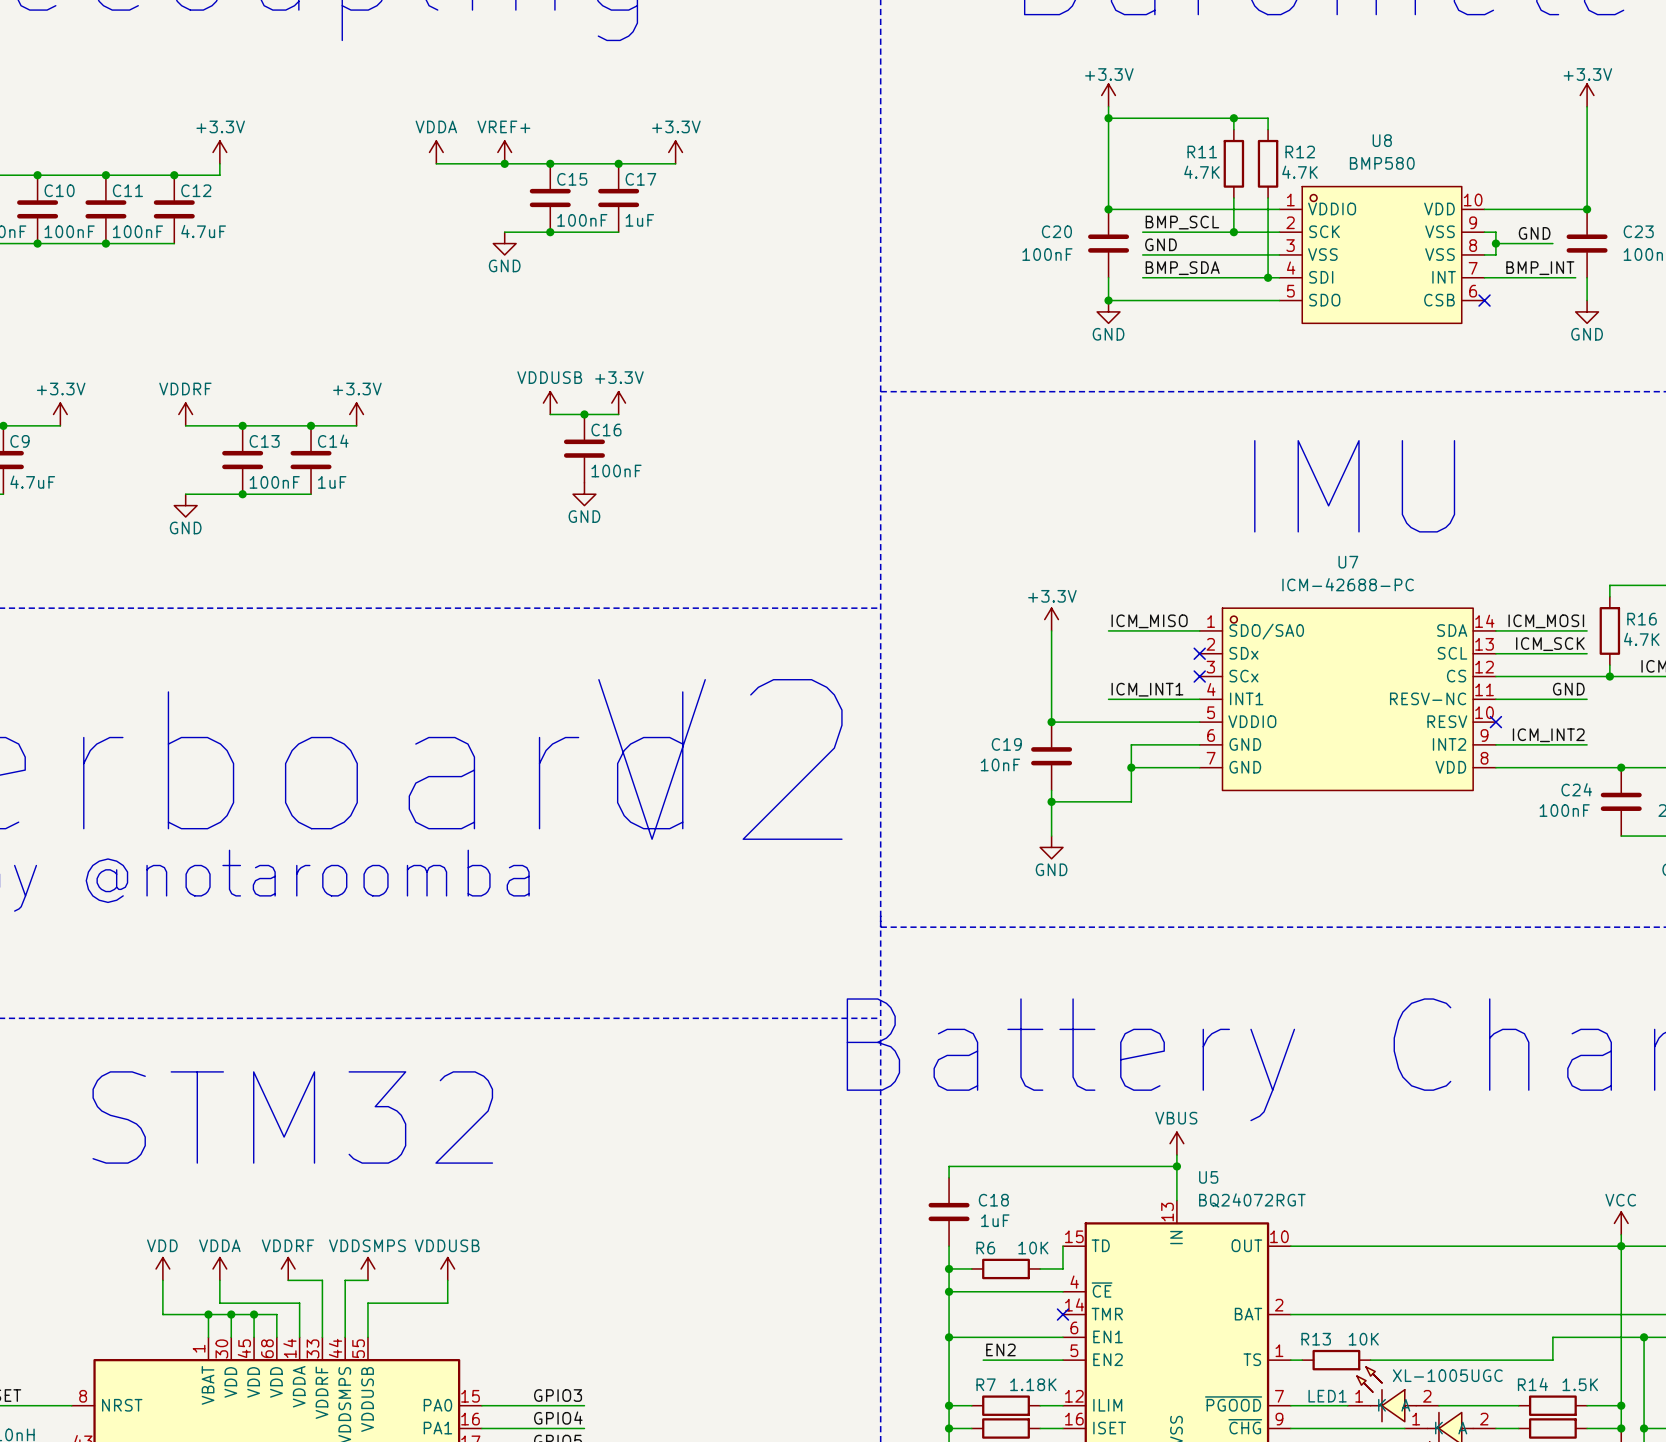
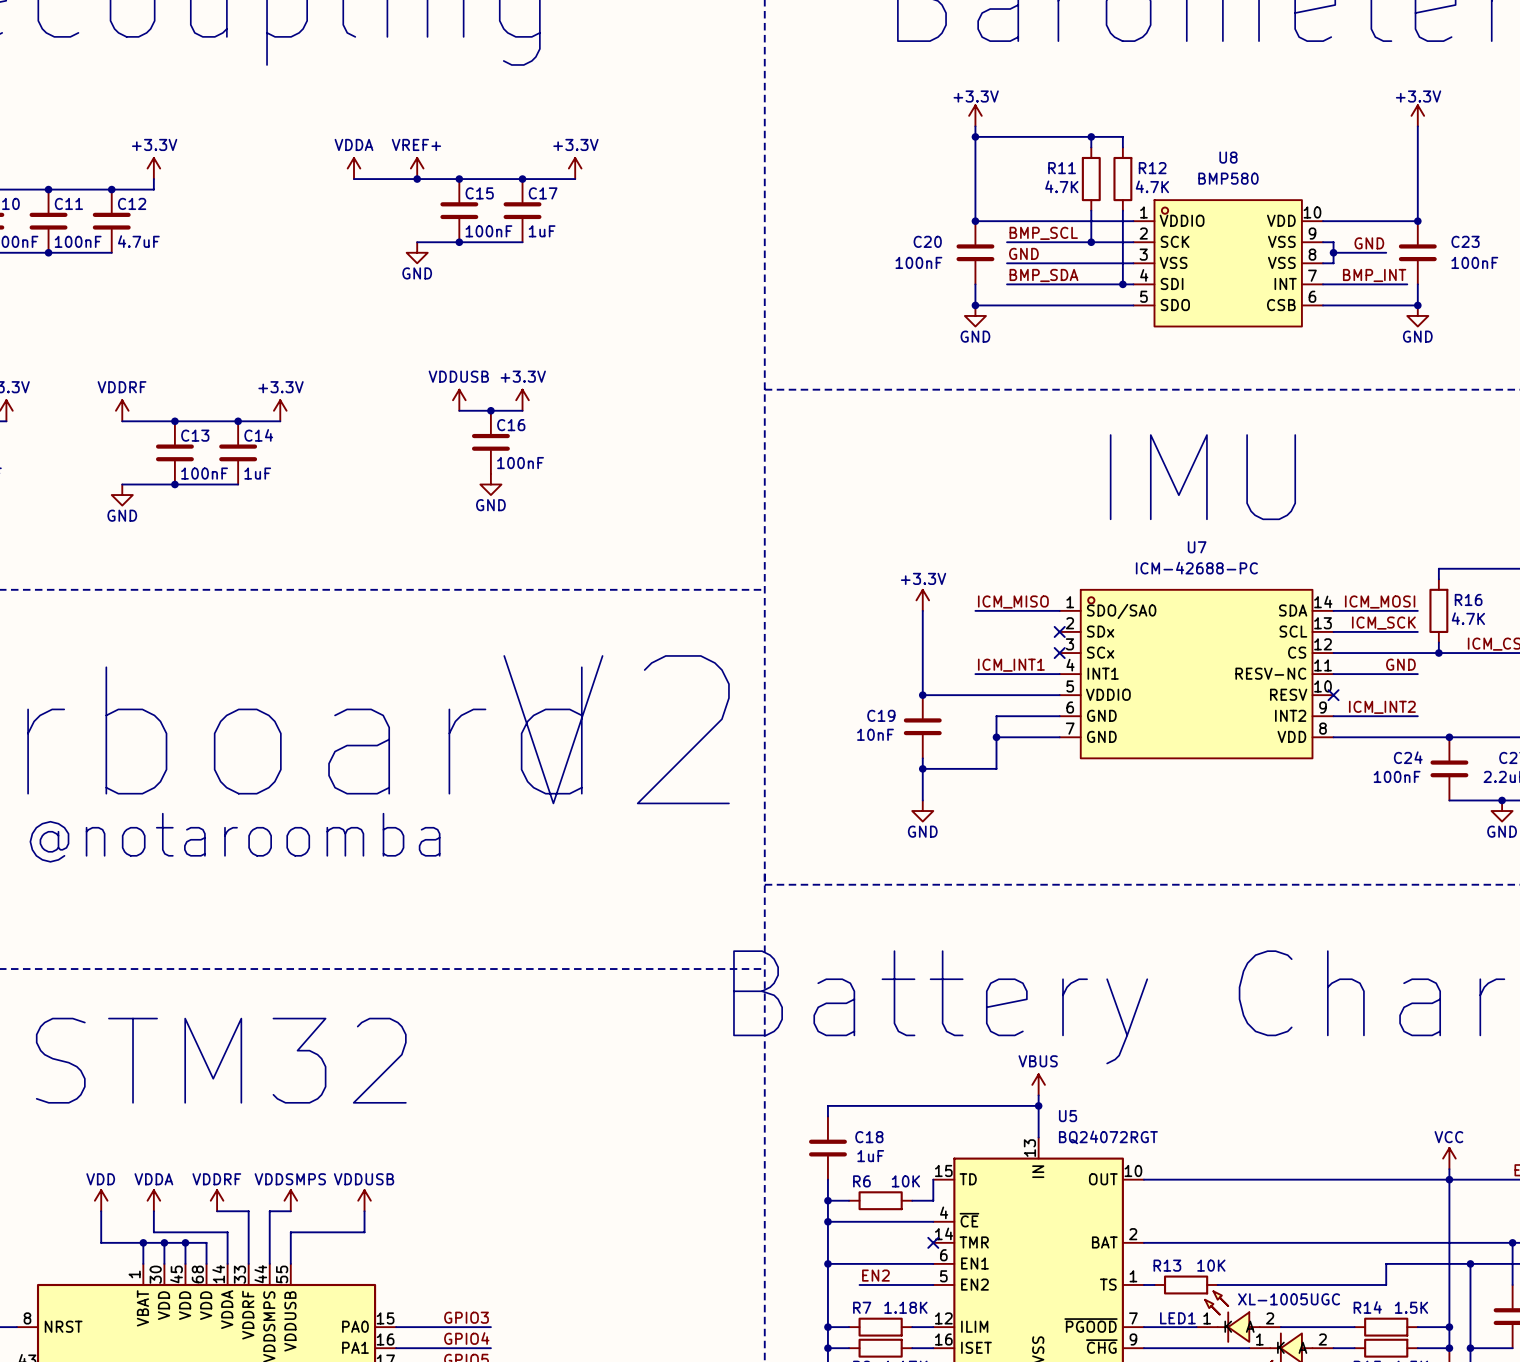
wire: none -> (1323, 305) (1417, 305)
no-connect mark: (1484, 300) -> none
junction: none -> (1417, 305)

